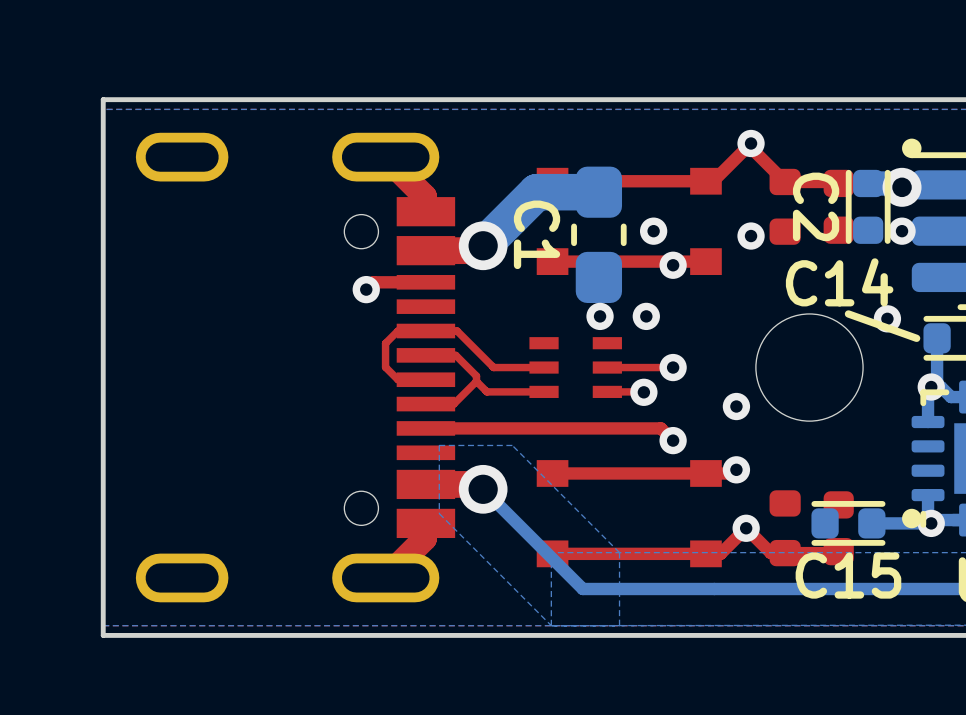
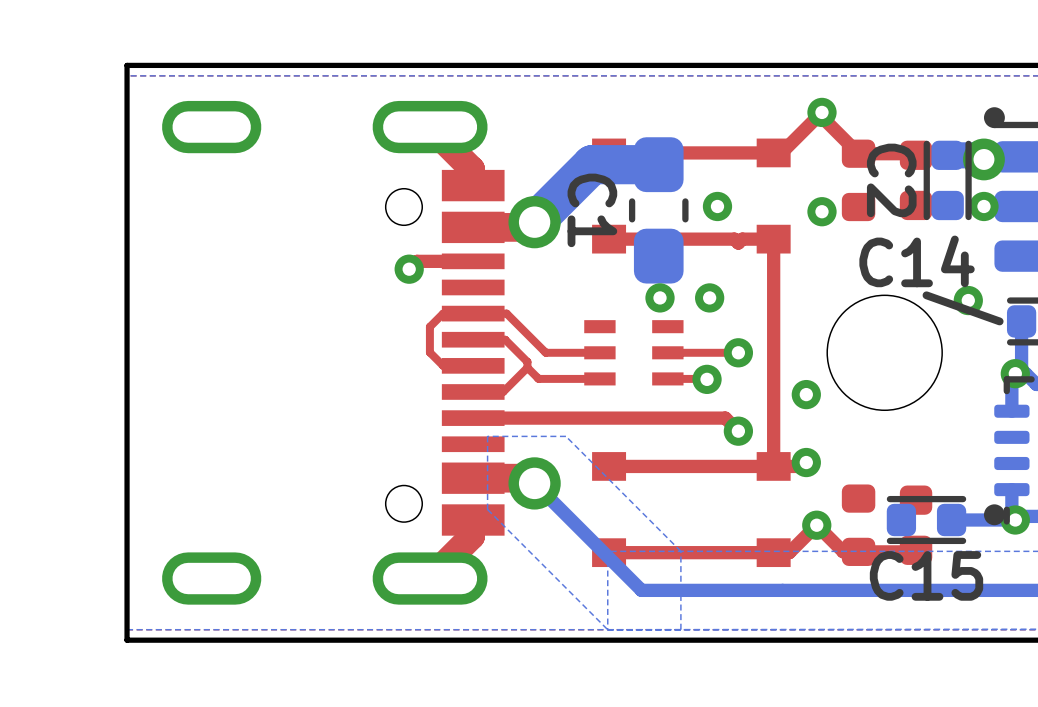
top track: none -> (773, 239) (773, 466)
via: (673, 265) -> none

